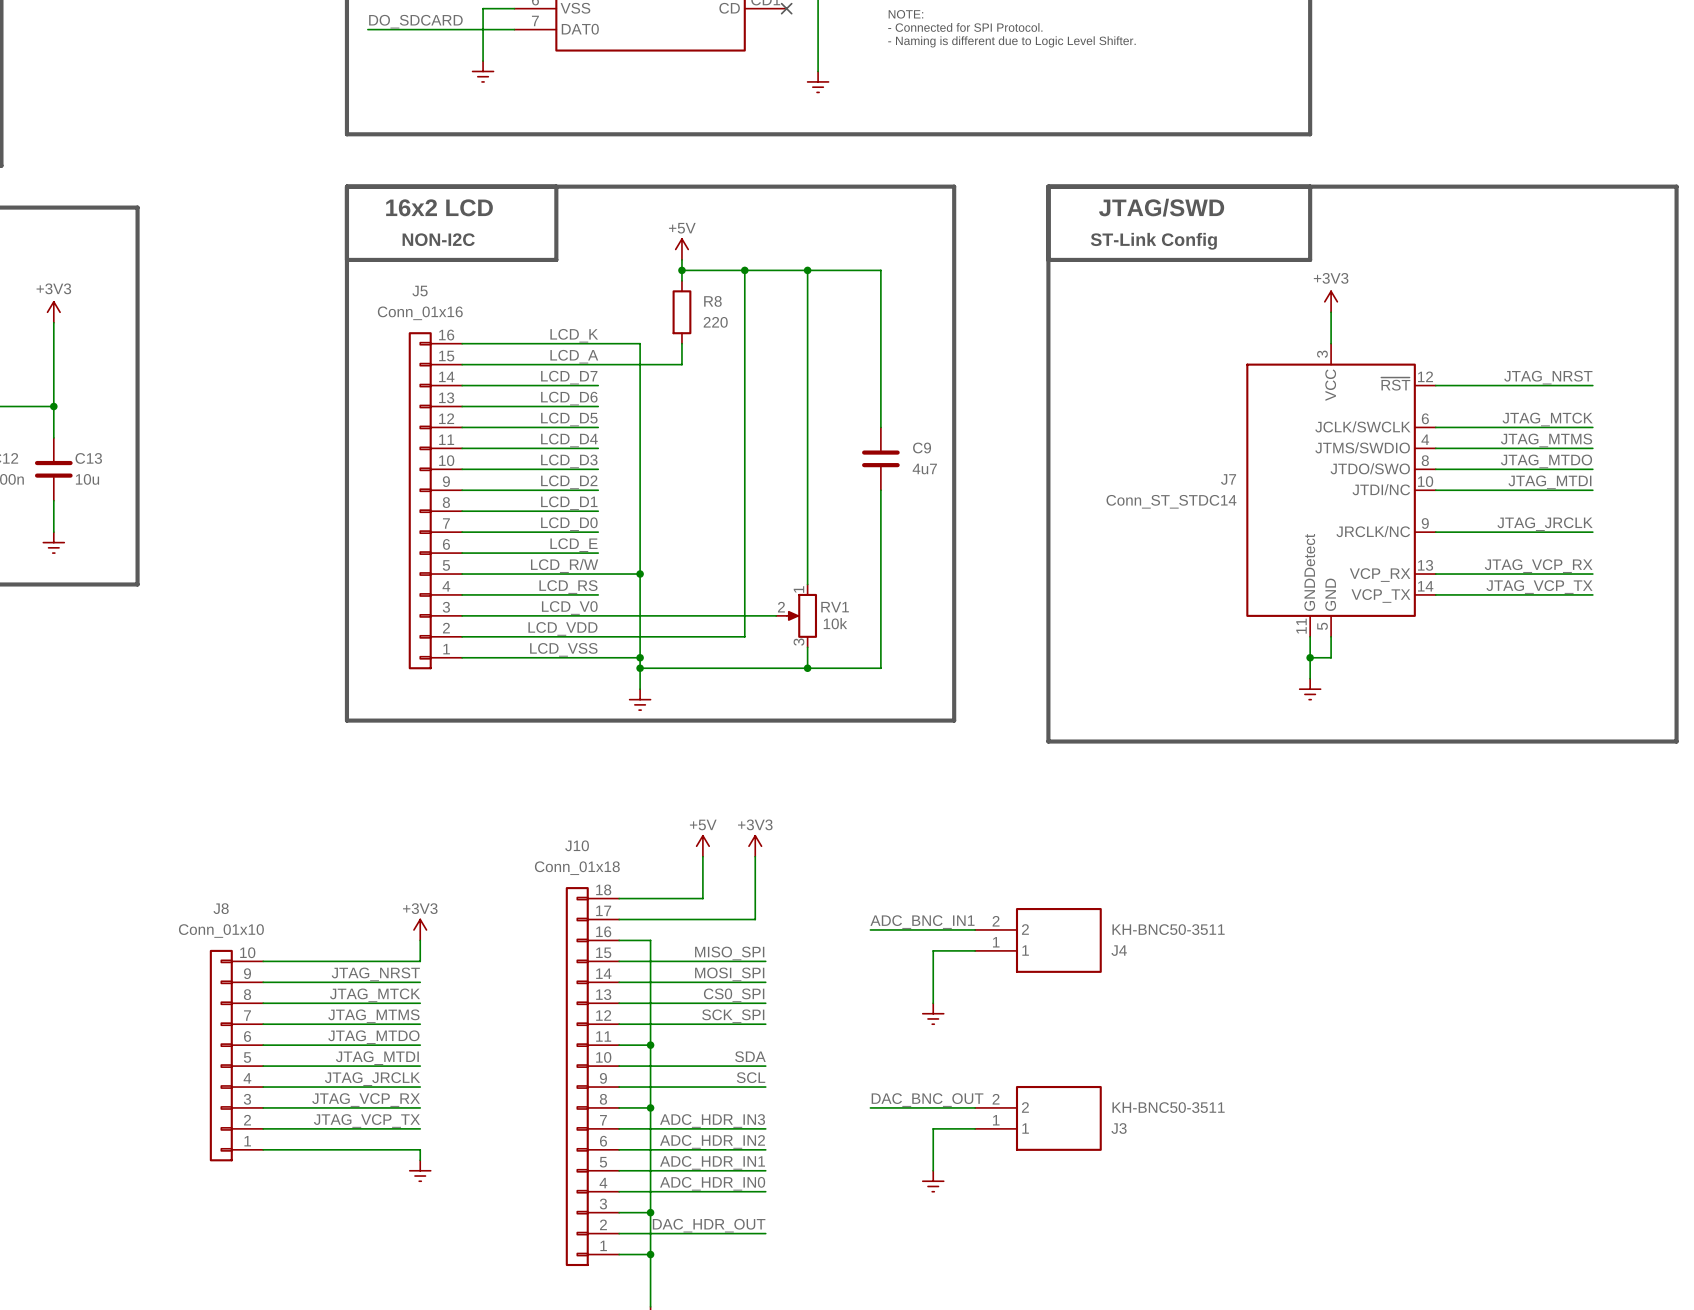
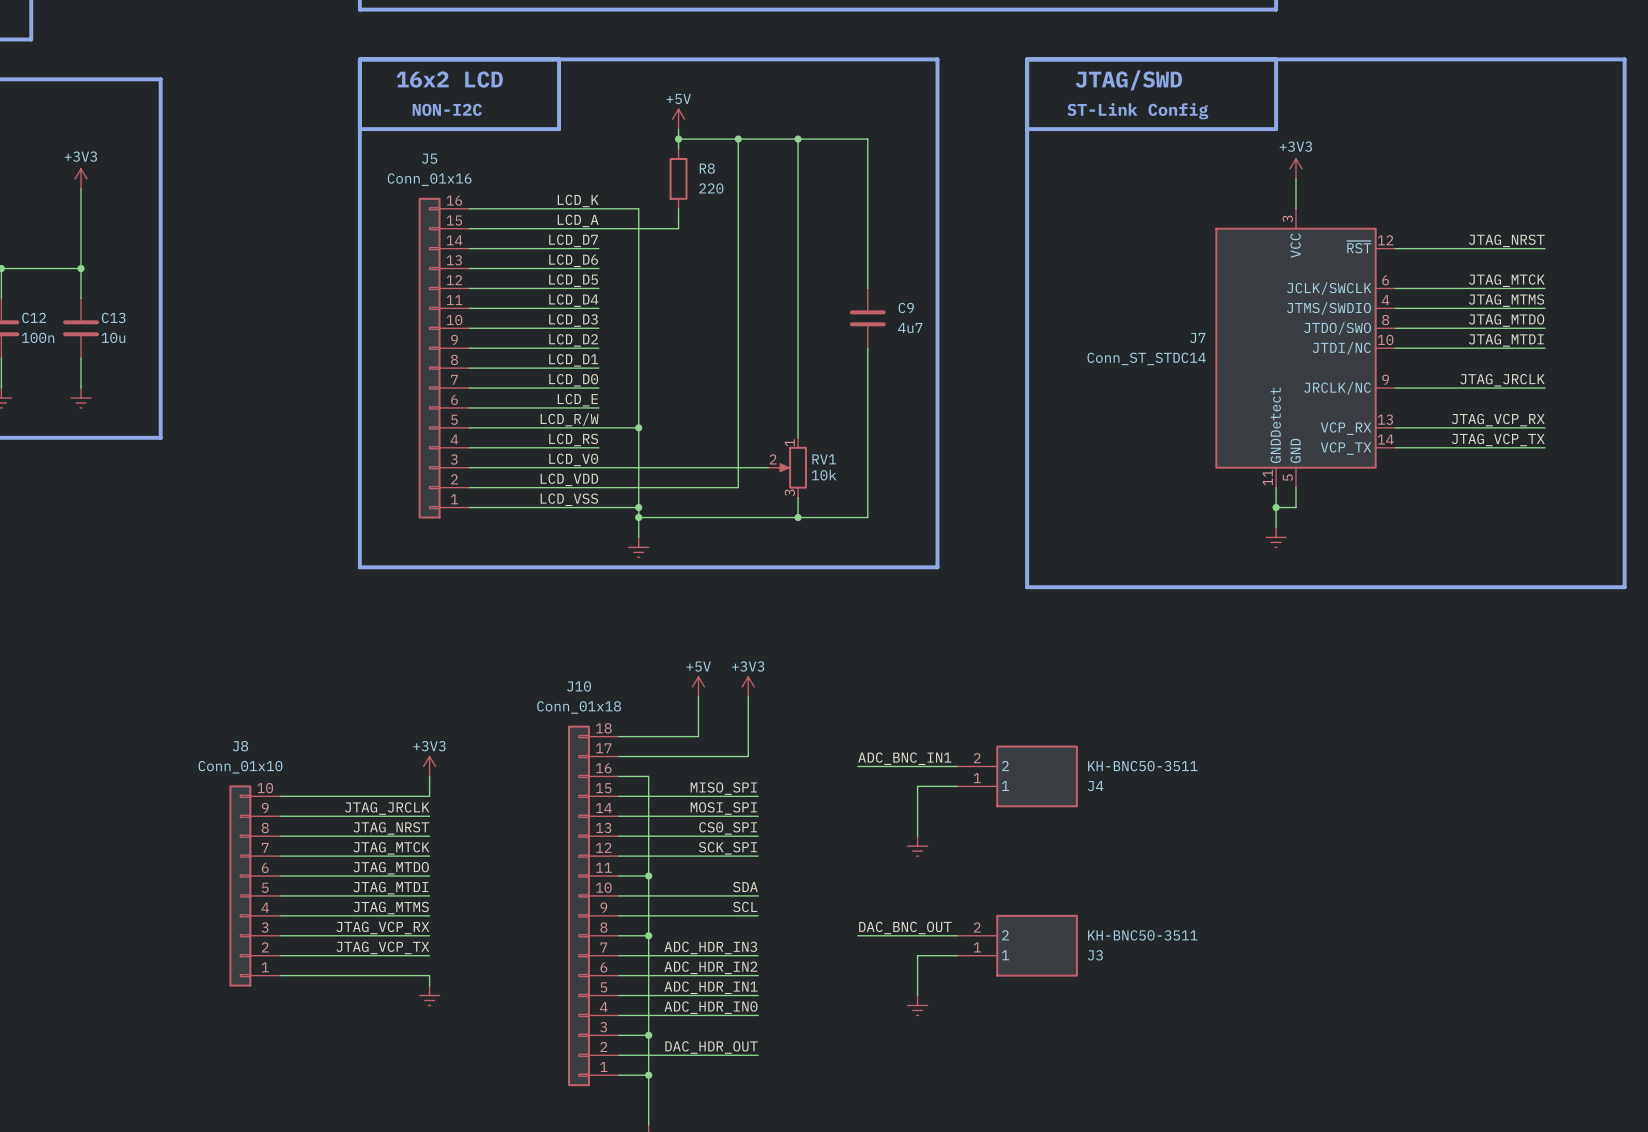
label: JTAG_NRST (375, 974) -> JTAG_JRCLK (387, 808)
label: JTAG_MTCK (375, 995) -> JTAG_NRST (391, 828)
label: JTAG_MTMS (373, 1016) -> JTAG_MTCK (391, 848)
label: JTAG_JRCLK (372, 1079) -> JTAG_MTMS (391, 908)

